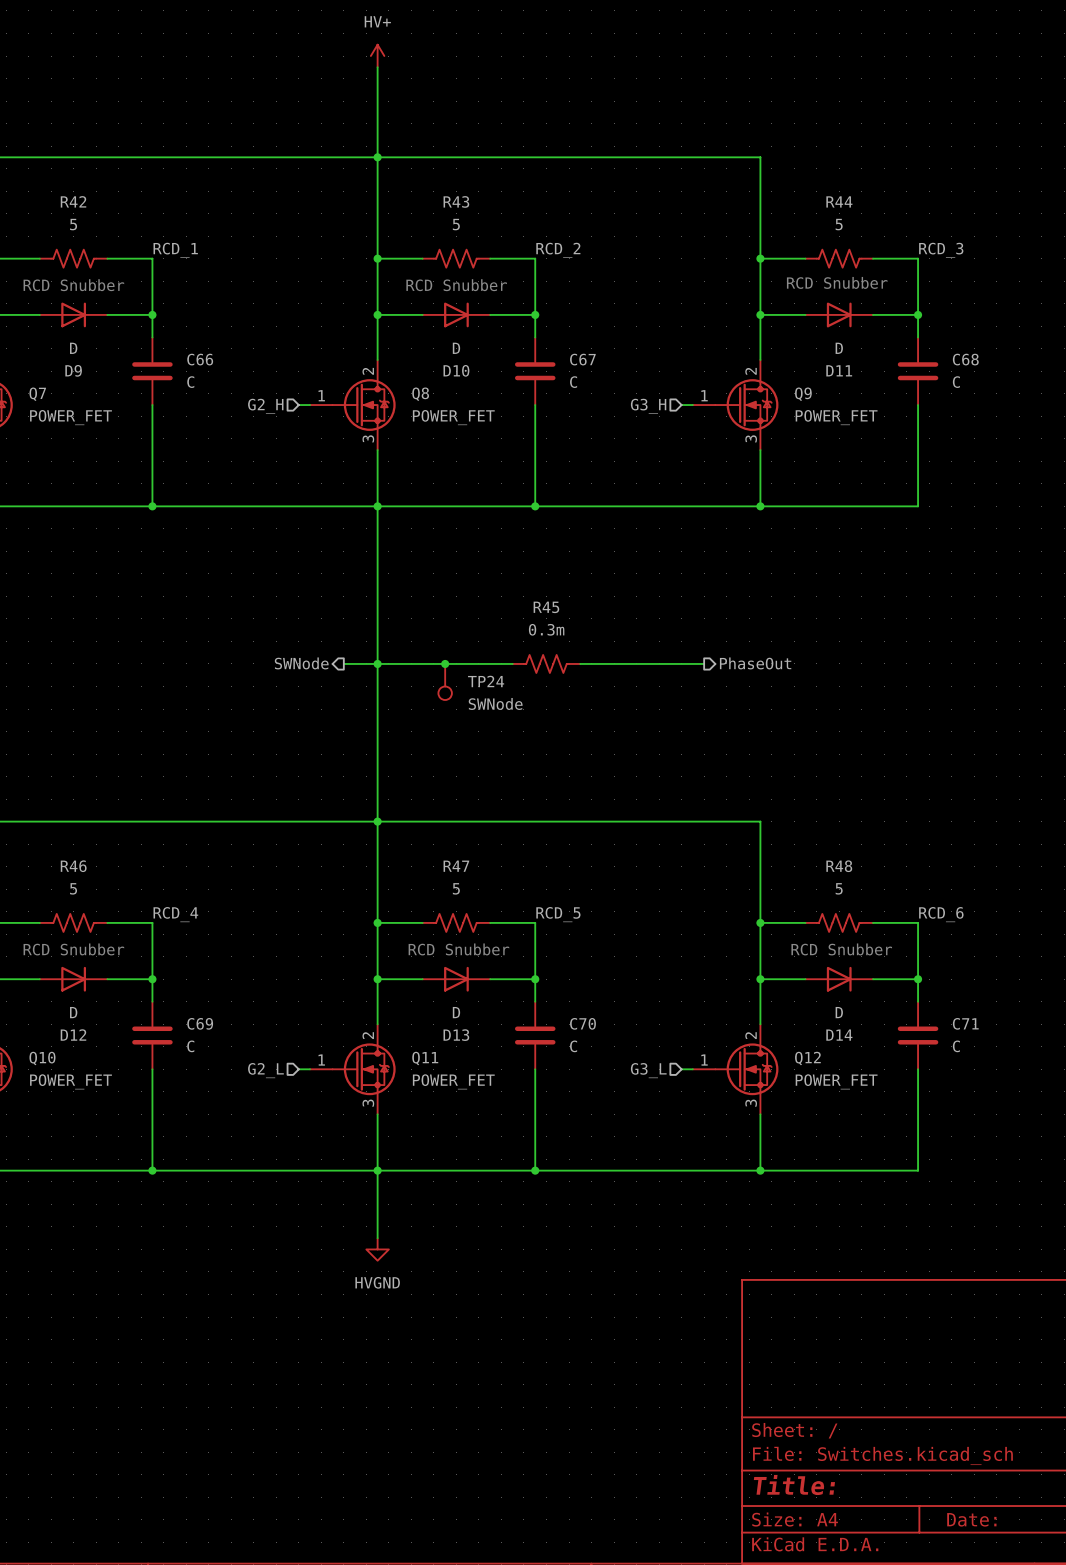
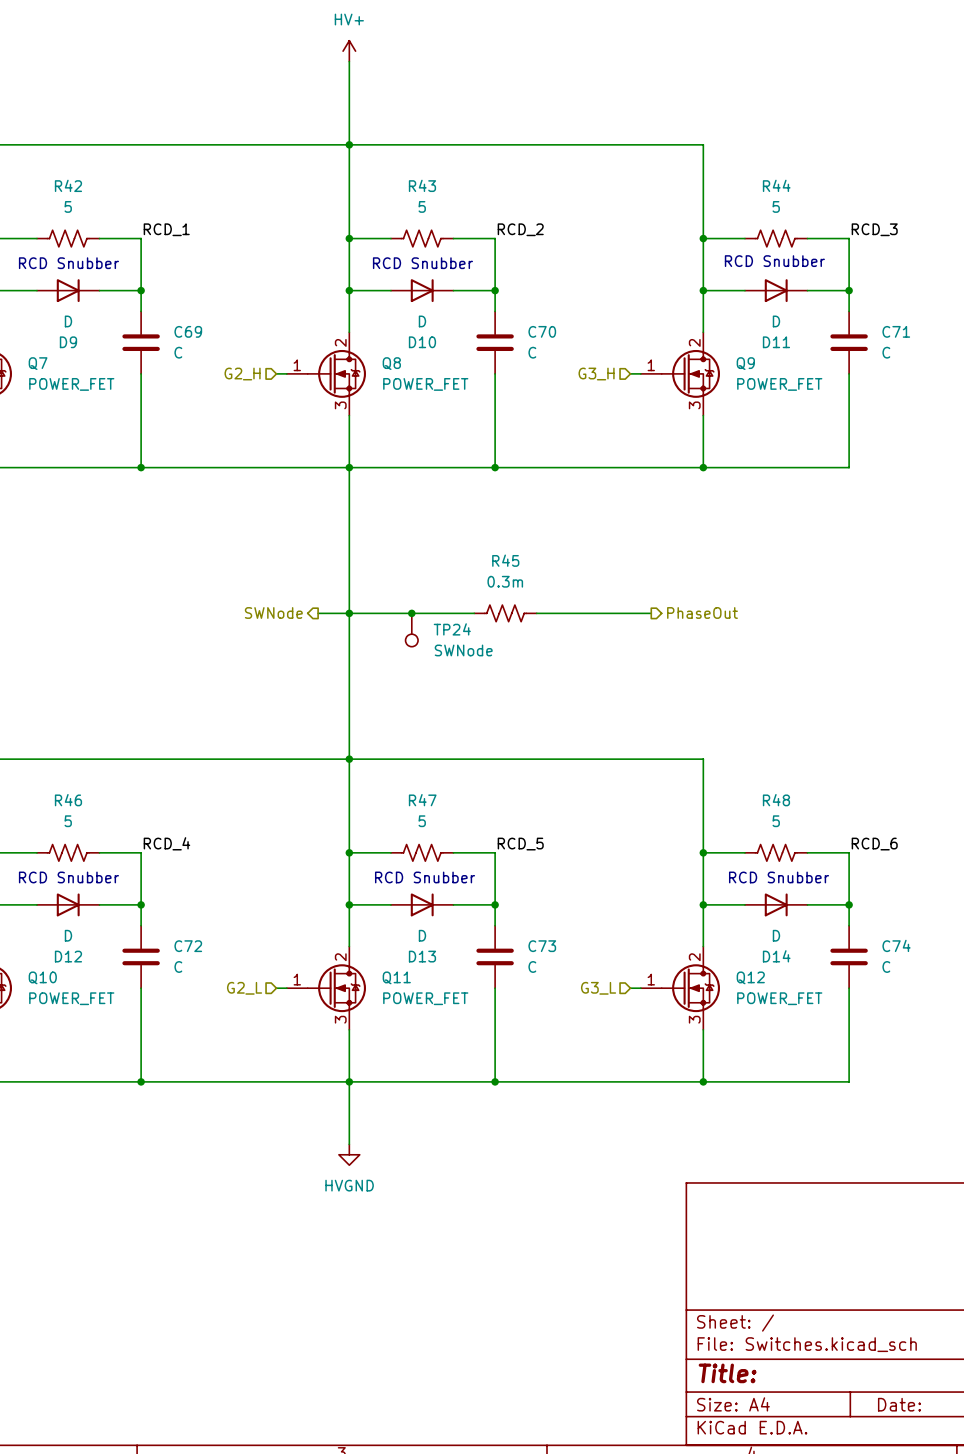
C66 name: C66 (200, 359) -> C69 (188, 331)
C67 name: C67 (582, 359) -> C70 (542, 331)
C68 name: C68 (965, 359) -> C71 (896, 331)
C69 name: C69 (200, 1023) -> C72 (188, 946)
C70 name: C70 (582, 1023) -> C73 (542, 946)
C71 name: C71 (965, 1023) -> C74 (896, 945)

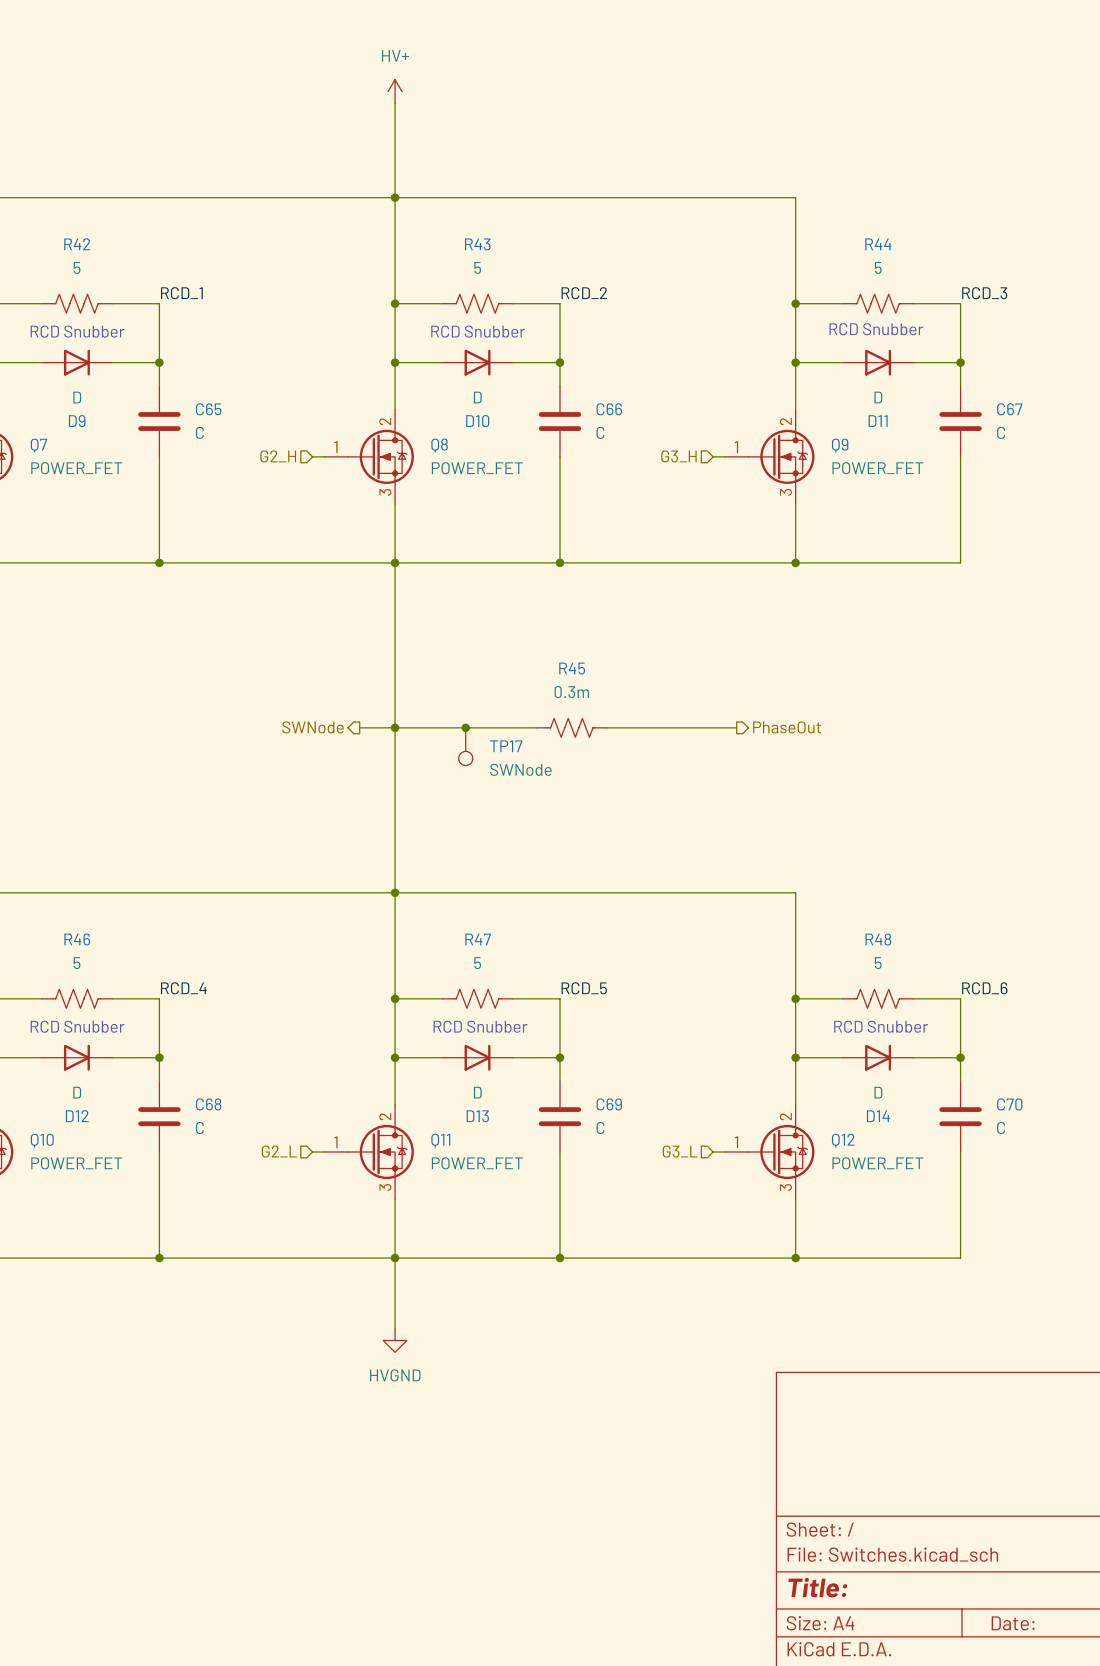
C69 name: C69 (188, 331) -> C65 (208, 409)
C70 name: C70 (542, 331) -> C66 (609, 409)
C71 name: C71 (896, 331) -> C67 (1009, 409)
TP24 name: TP24 (452, 629) -> TP17 (506, 746)
C74 name: C74 (896, 945) -> C70 (1009, 1104)
C72 name: C72 (188, 946) -> C68 (208, 1104)
C73 name: C73 (542, 946) -> C69 (609, 1104)

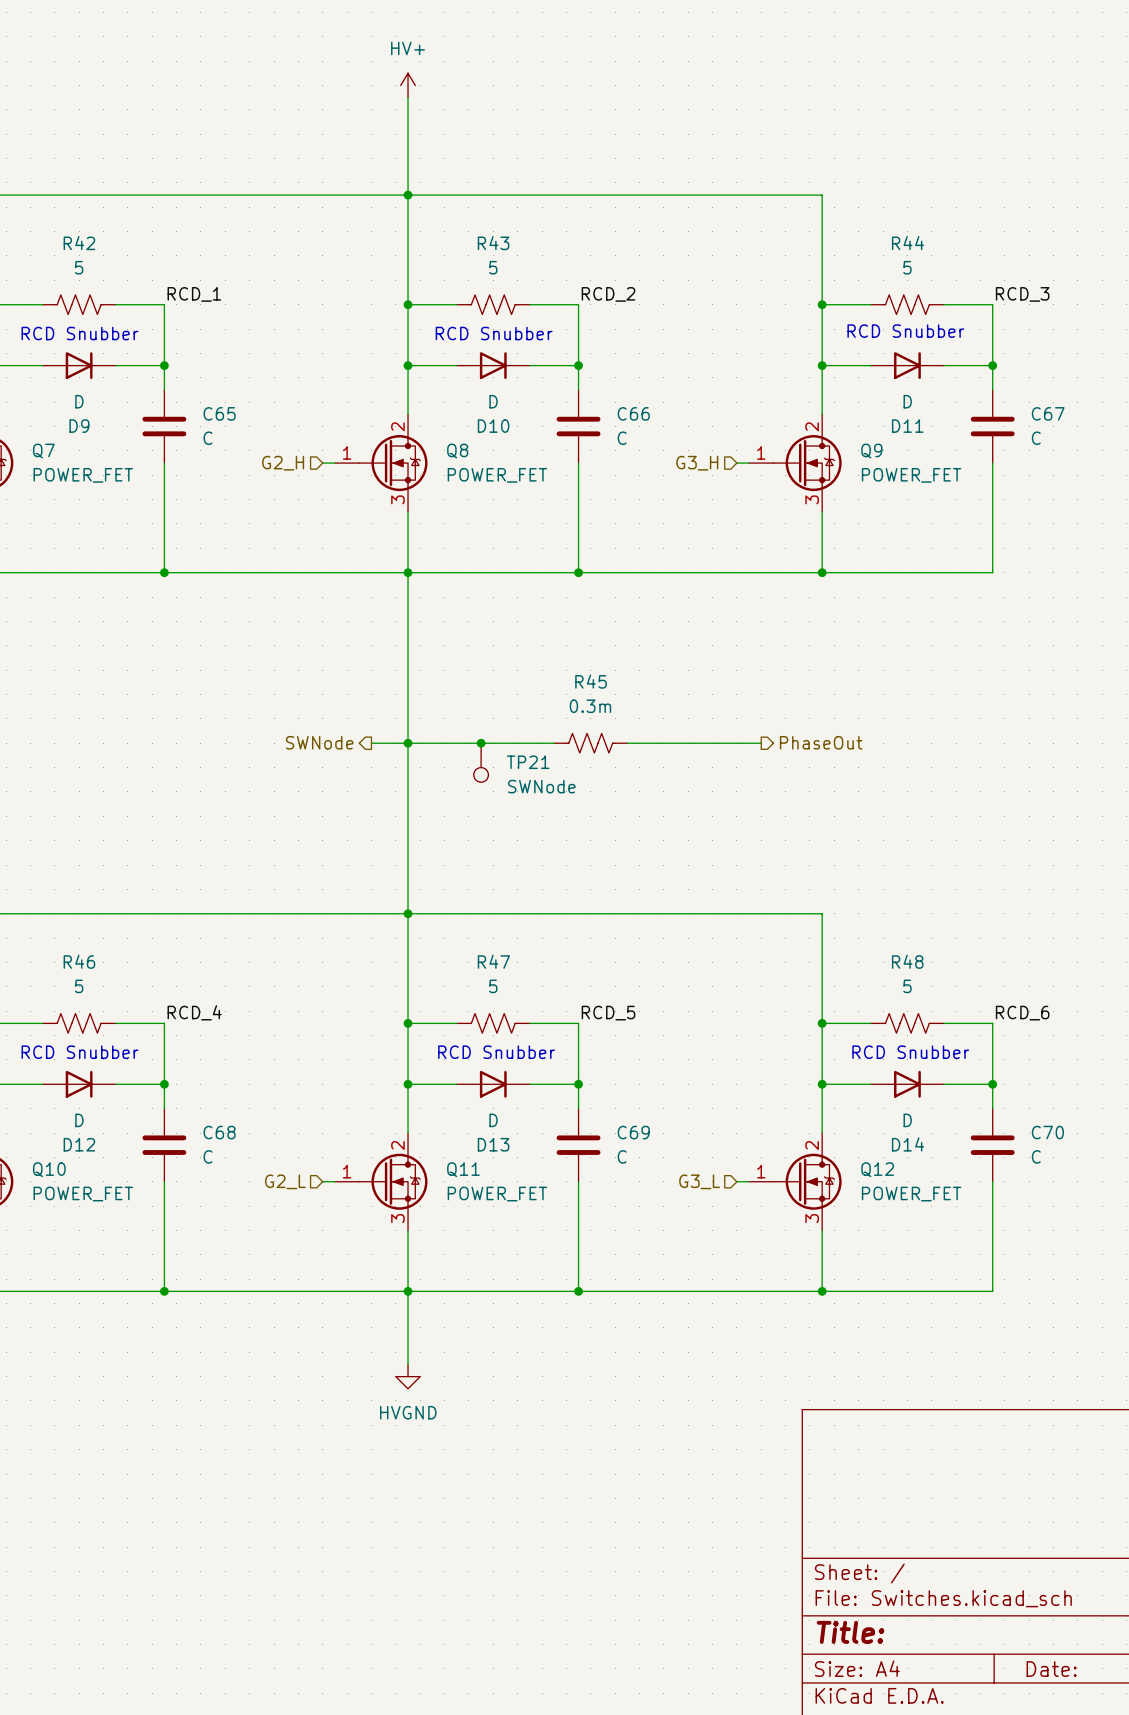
TP17 name: TP17 (506, 746) -> TP21 (528, 762)

